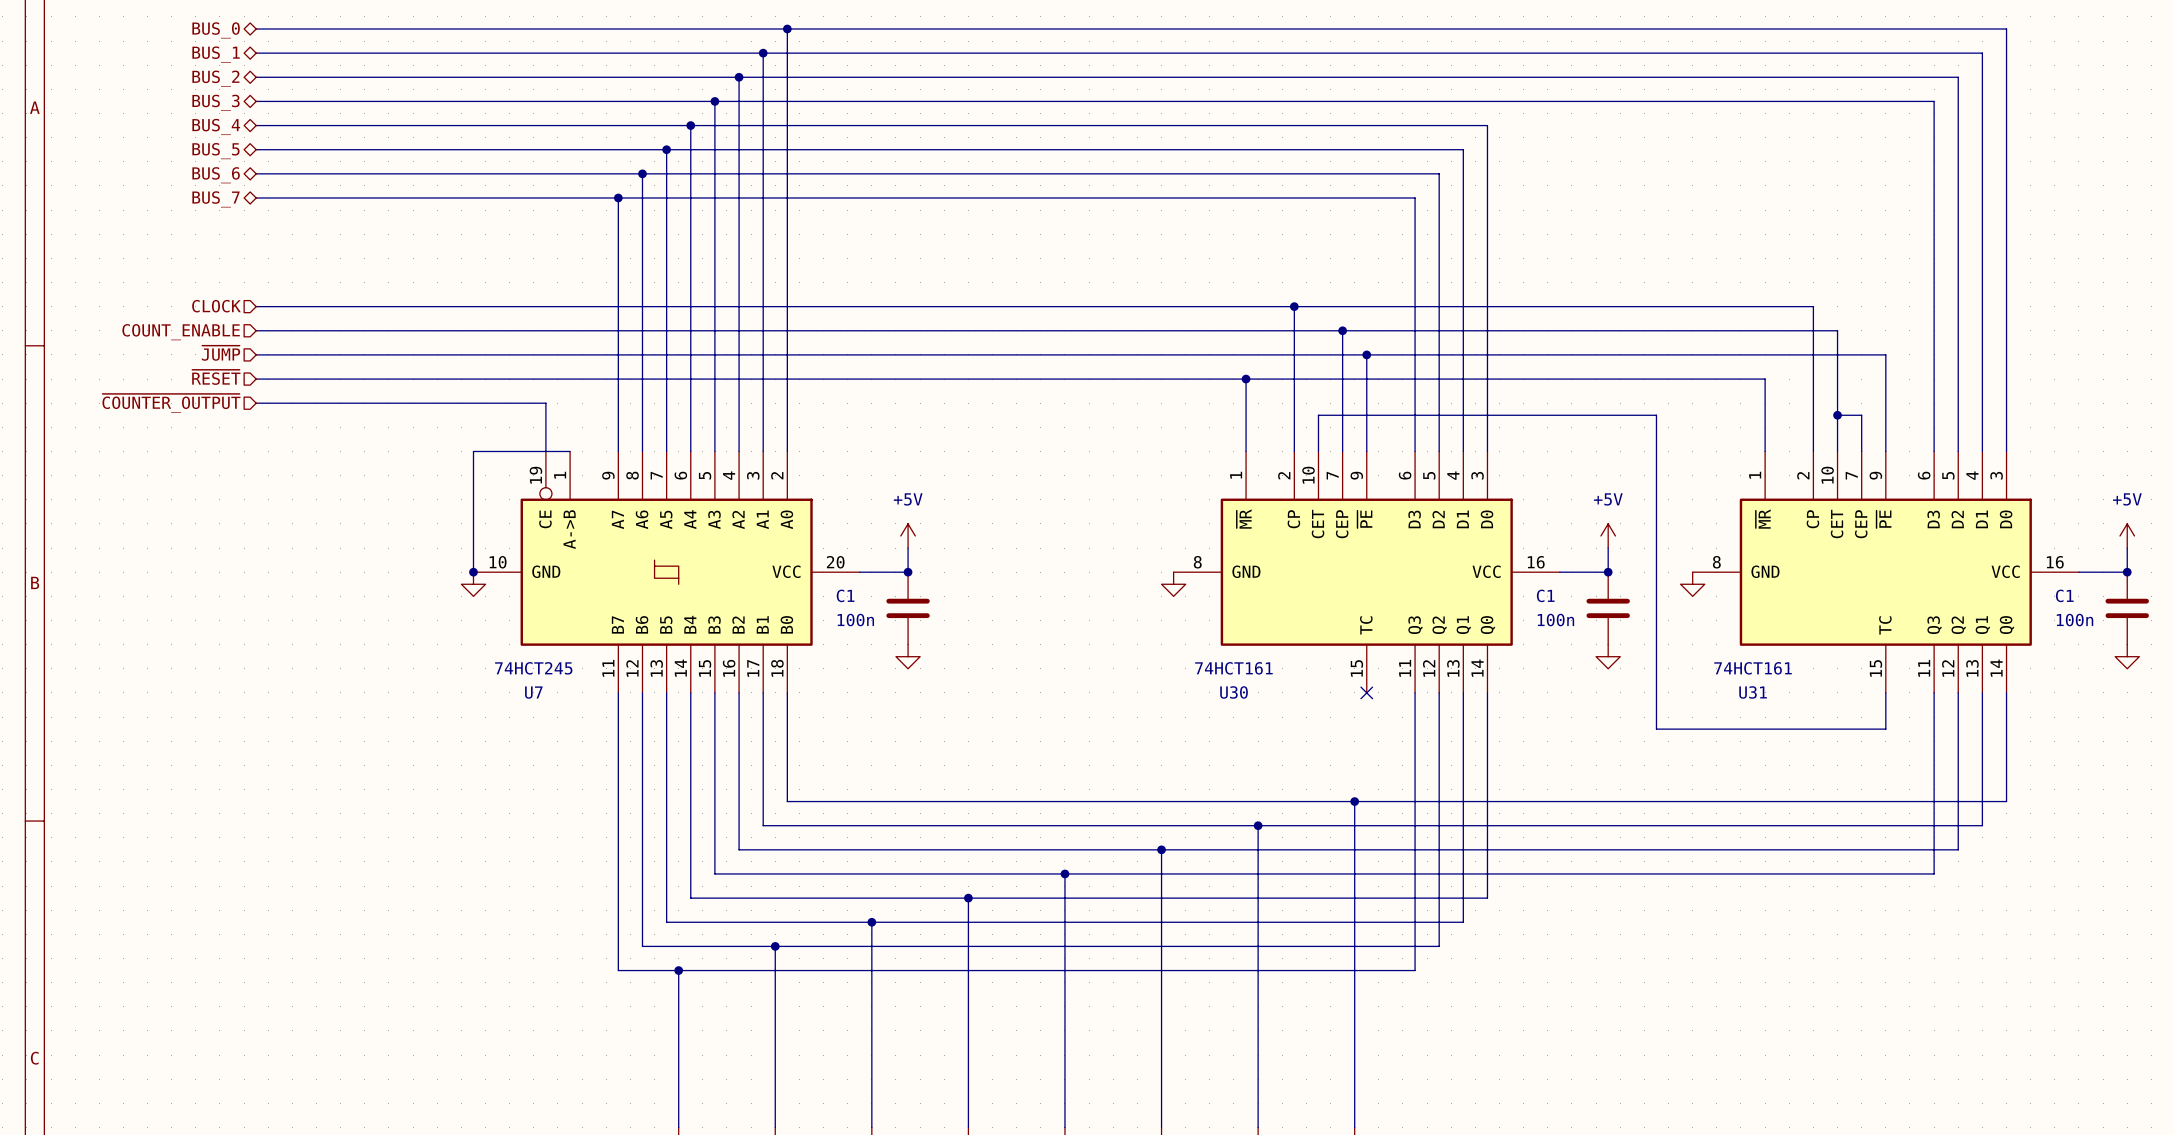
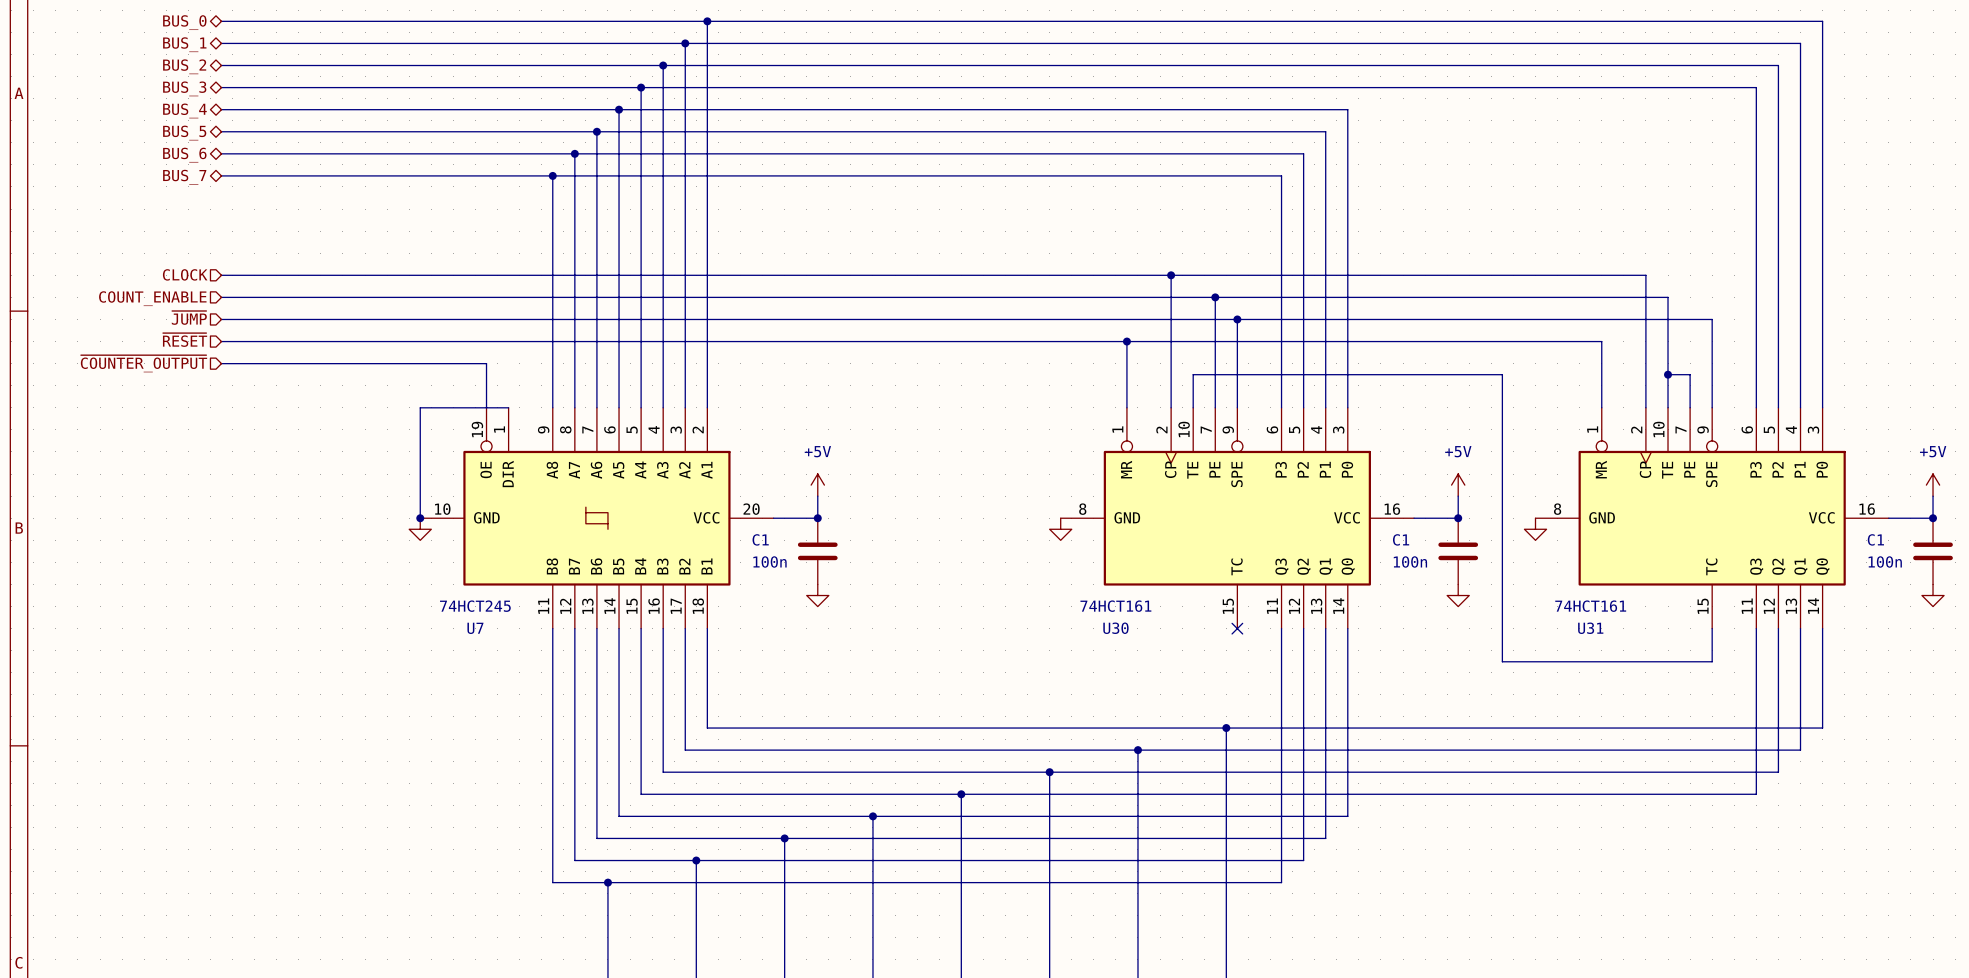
U7 symbol: [473, 451, 860, 693] -> [420, 407, 774, 629]
U30 symbol: [1173, 451, 1560, 693] -> [1060, 407, 1415, 629]
U31 symbol: [1692, 451, 2079, 693] -> [1535, 407, 1889, 629]

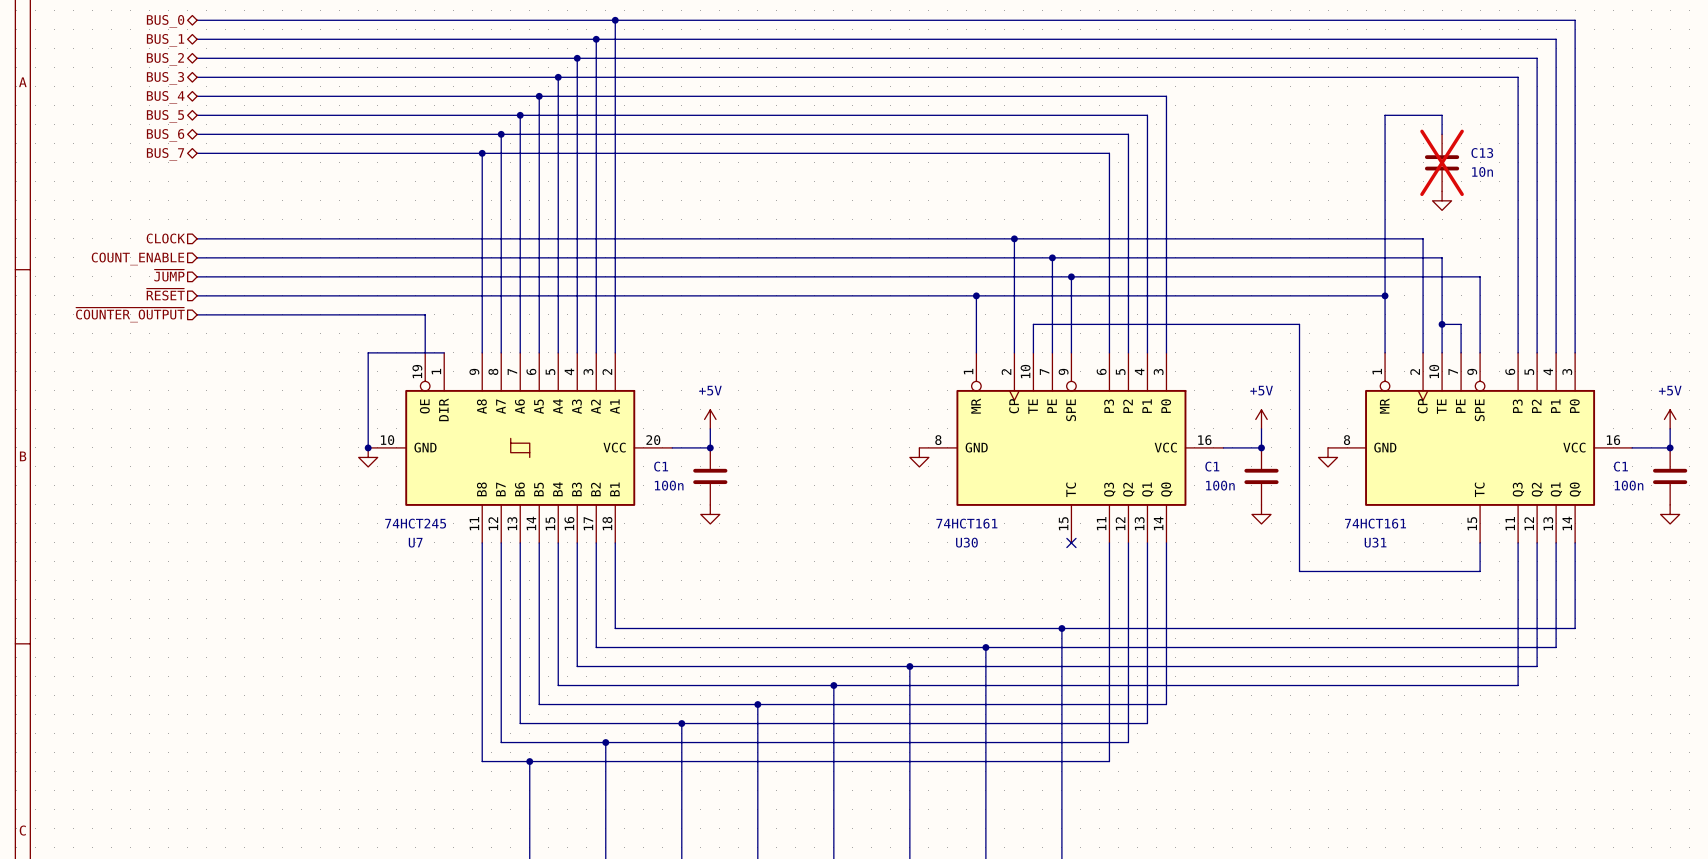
wire: none -> (1442, 134) (1442, 115) (1385, 115) (1385, 295)
C13: none -> 10n (1442, 162)
power symbol: none -> (1442, 200)
junction: none -> (1385, 295)

